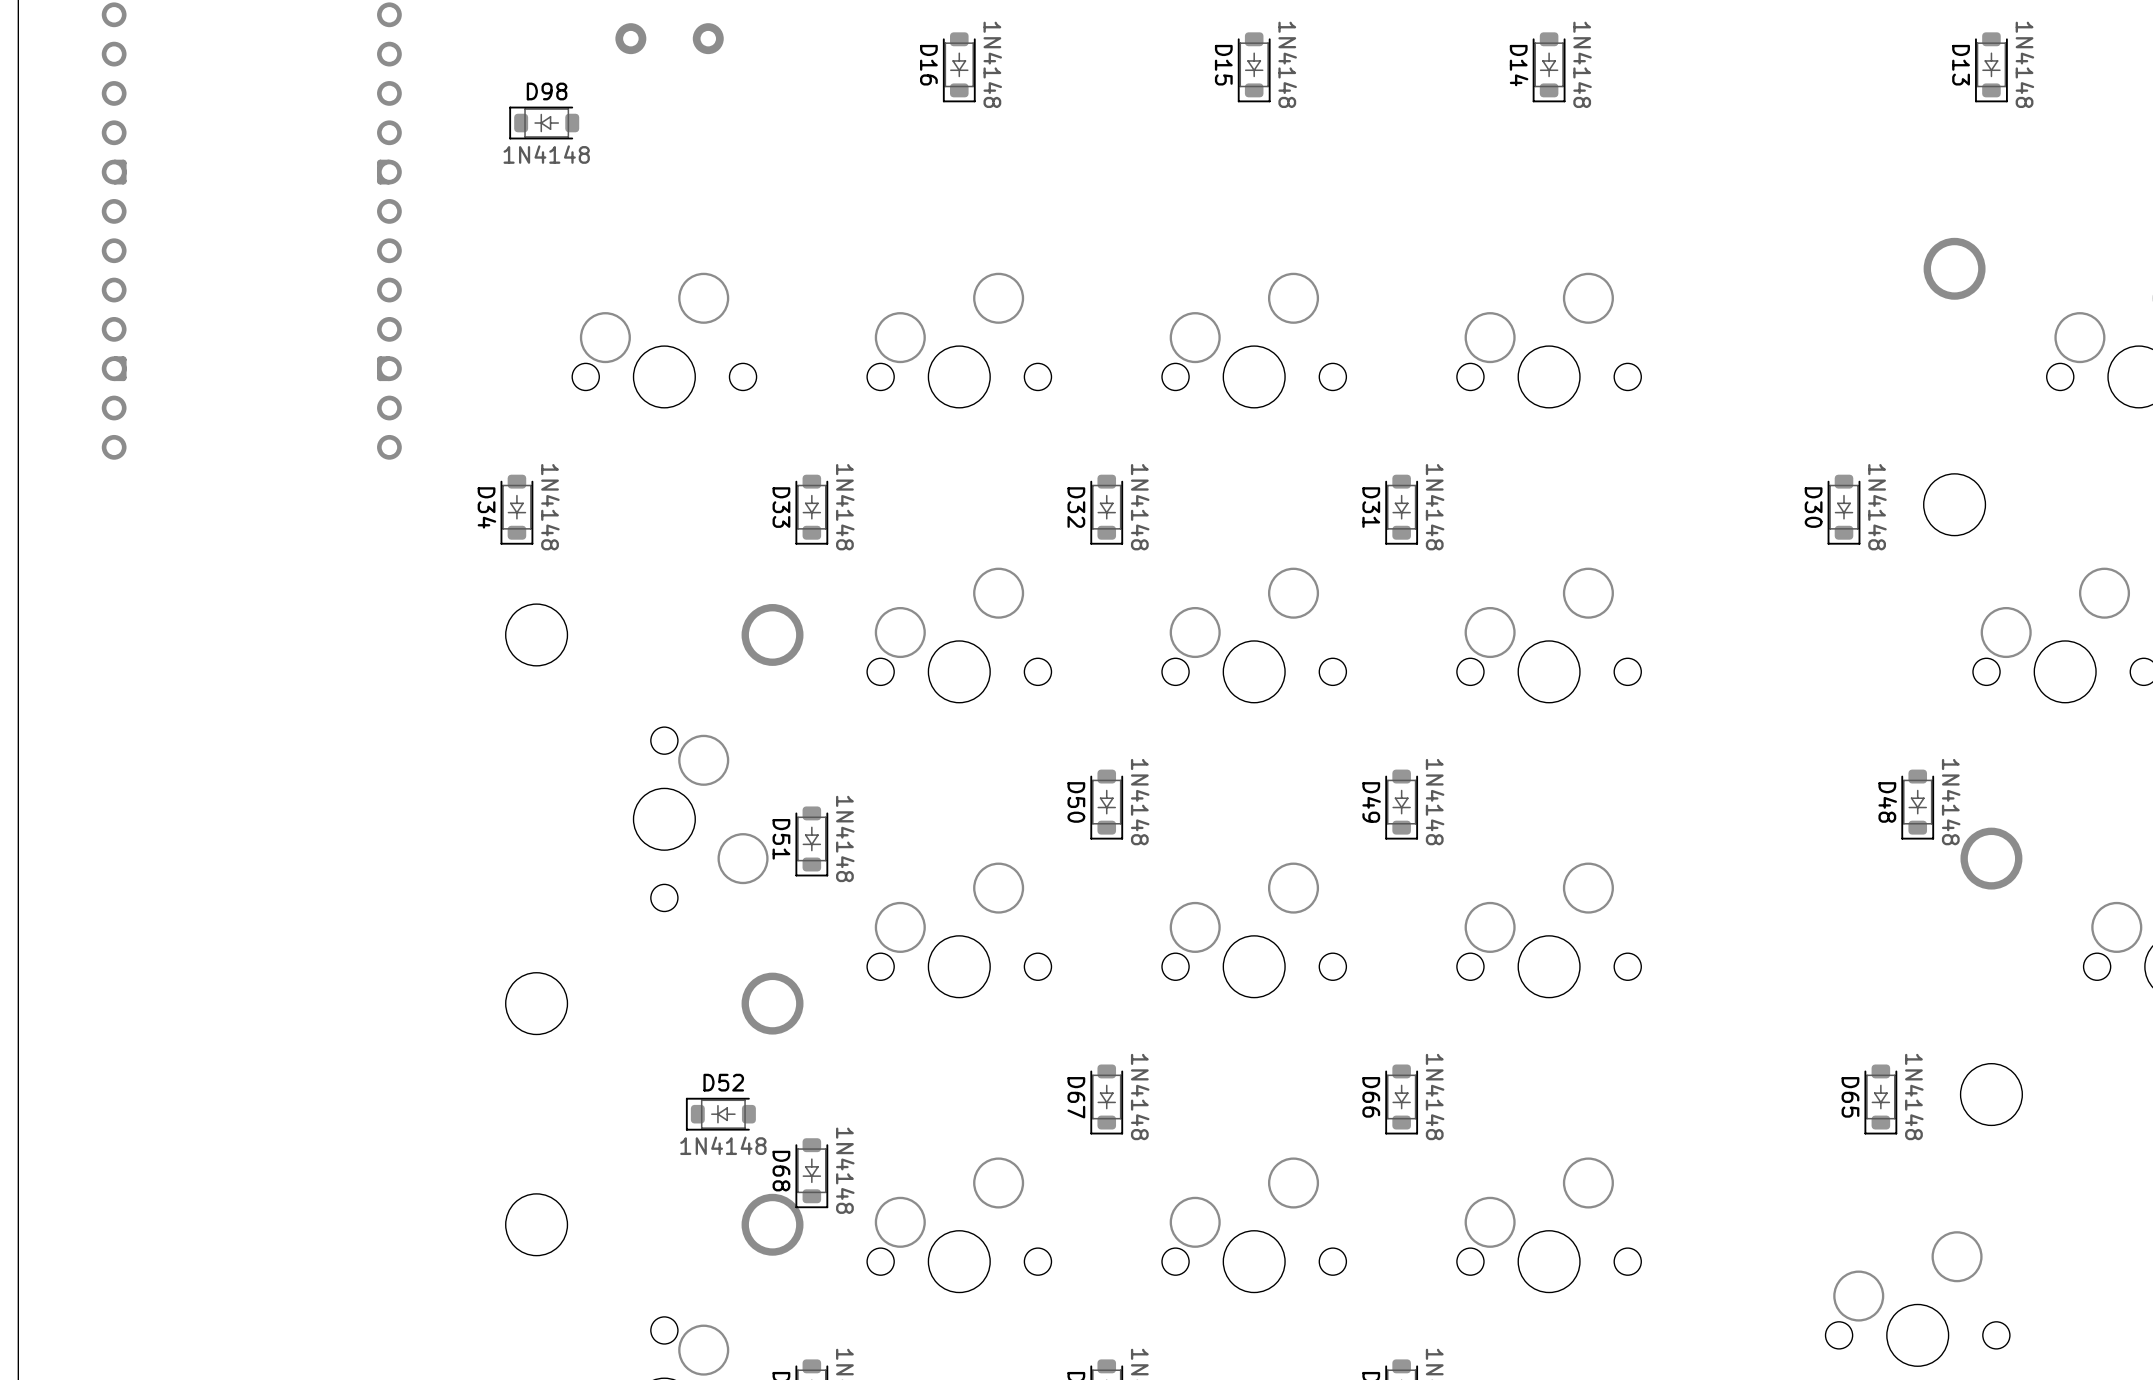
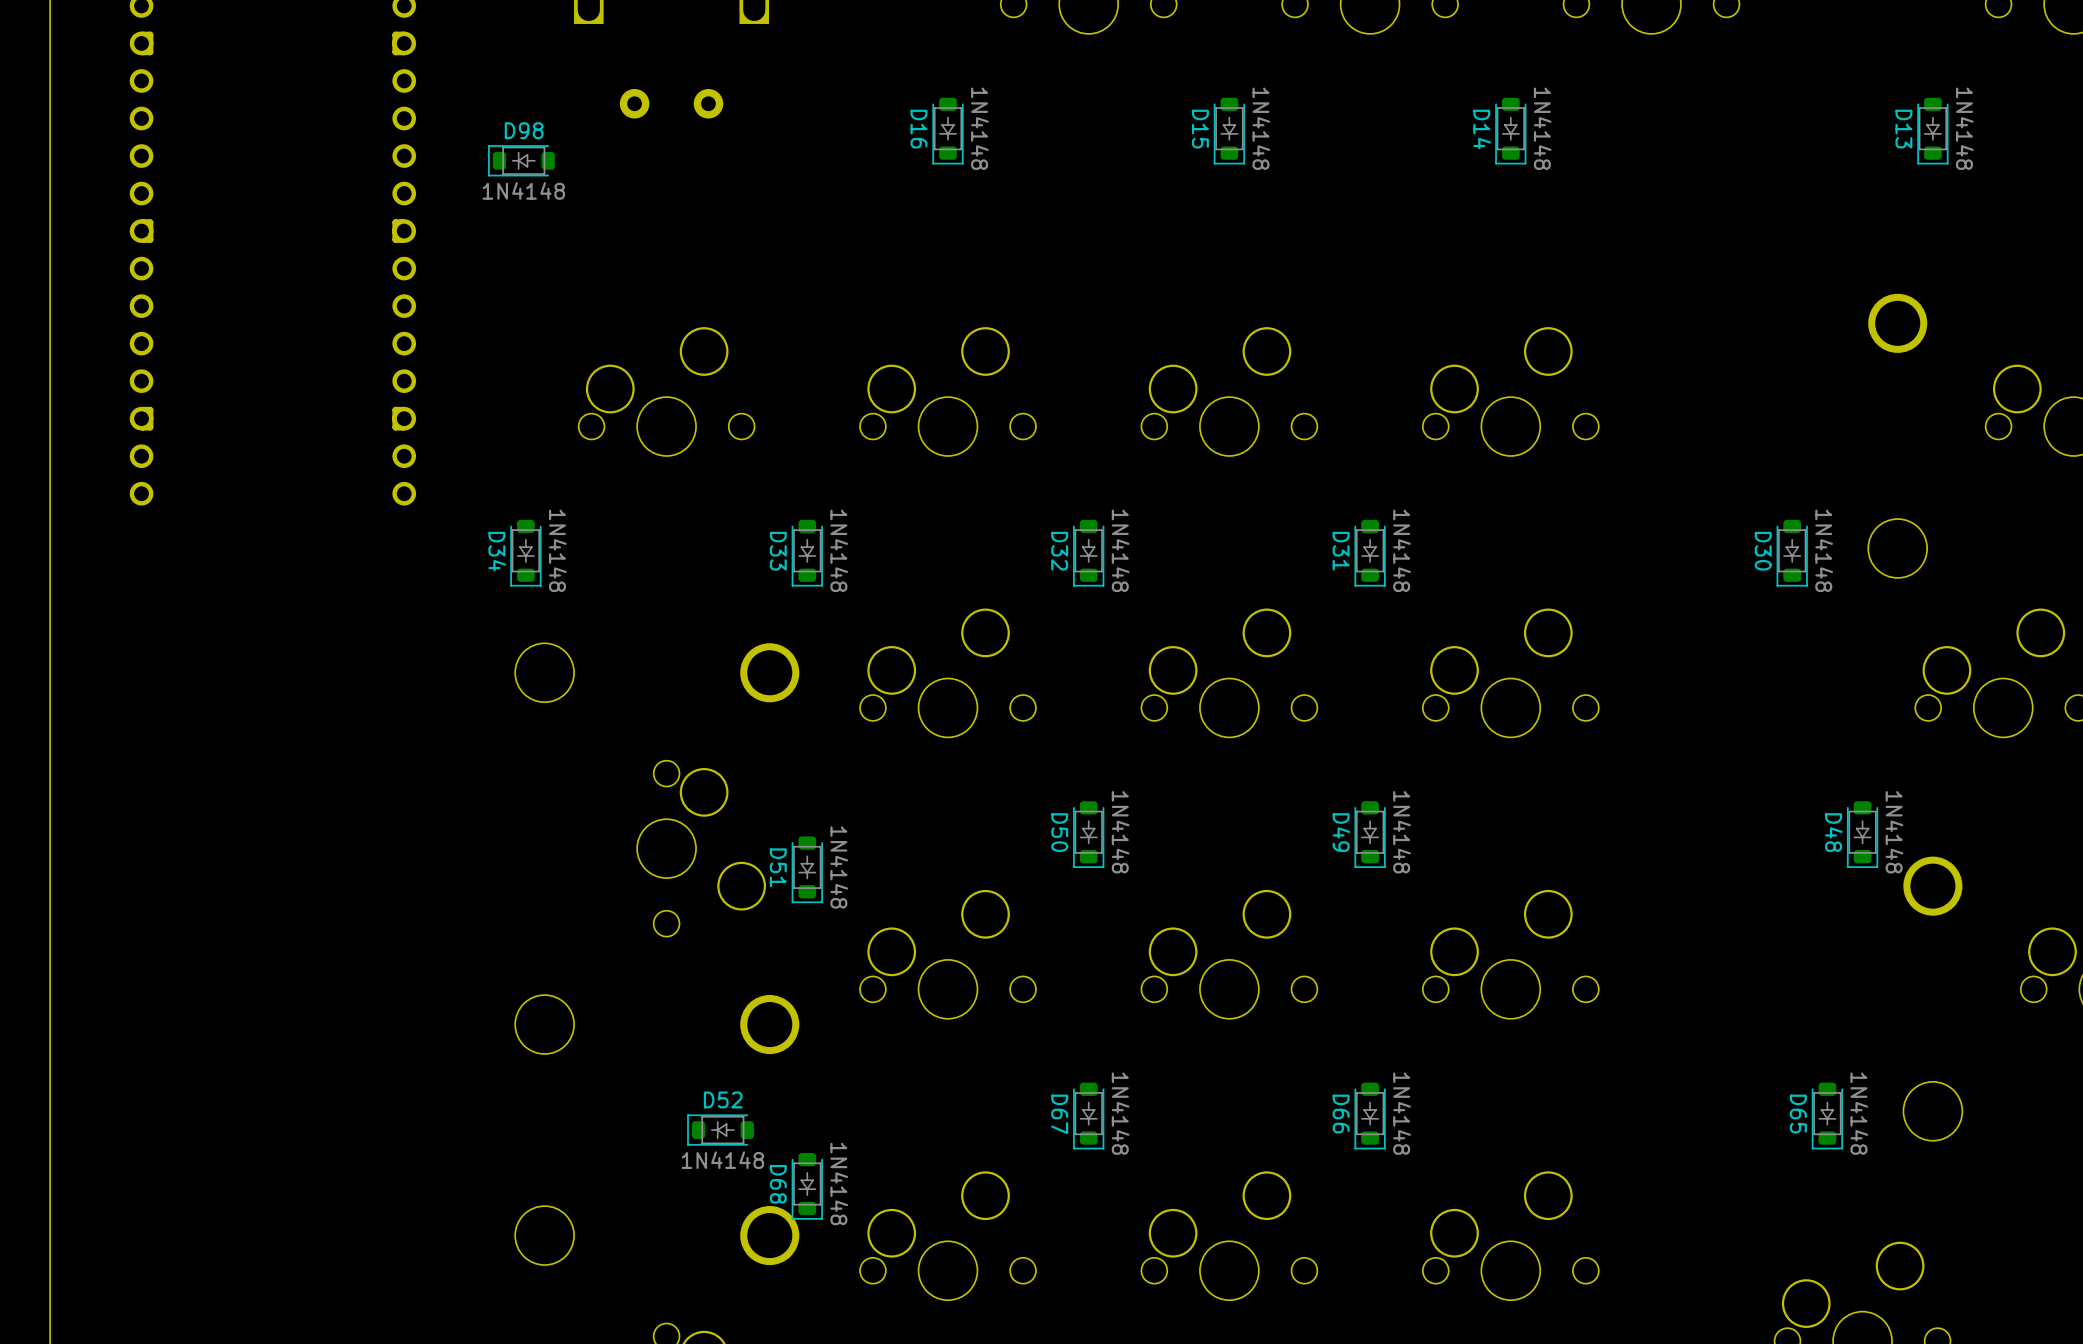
D98 position: (544, 123) -> (521, 160)

